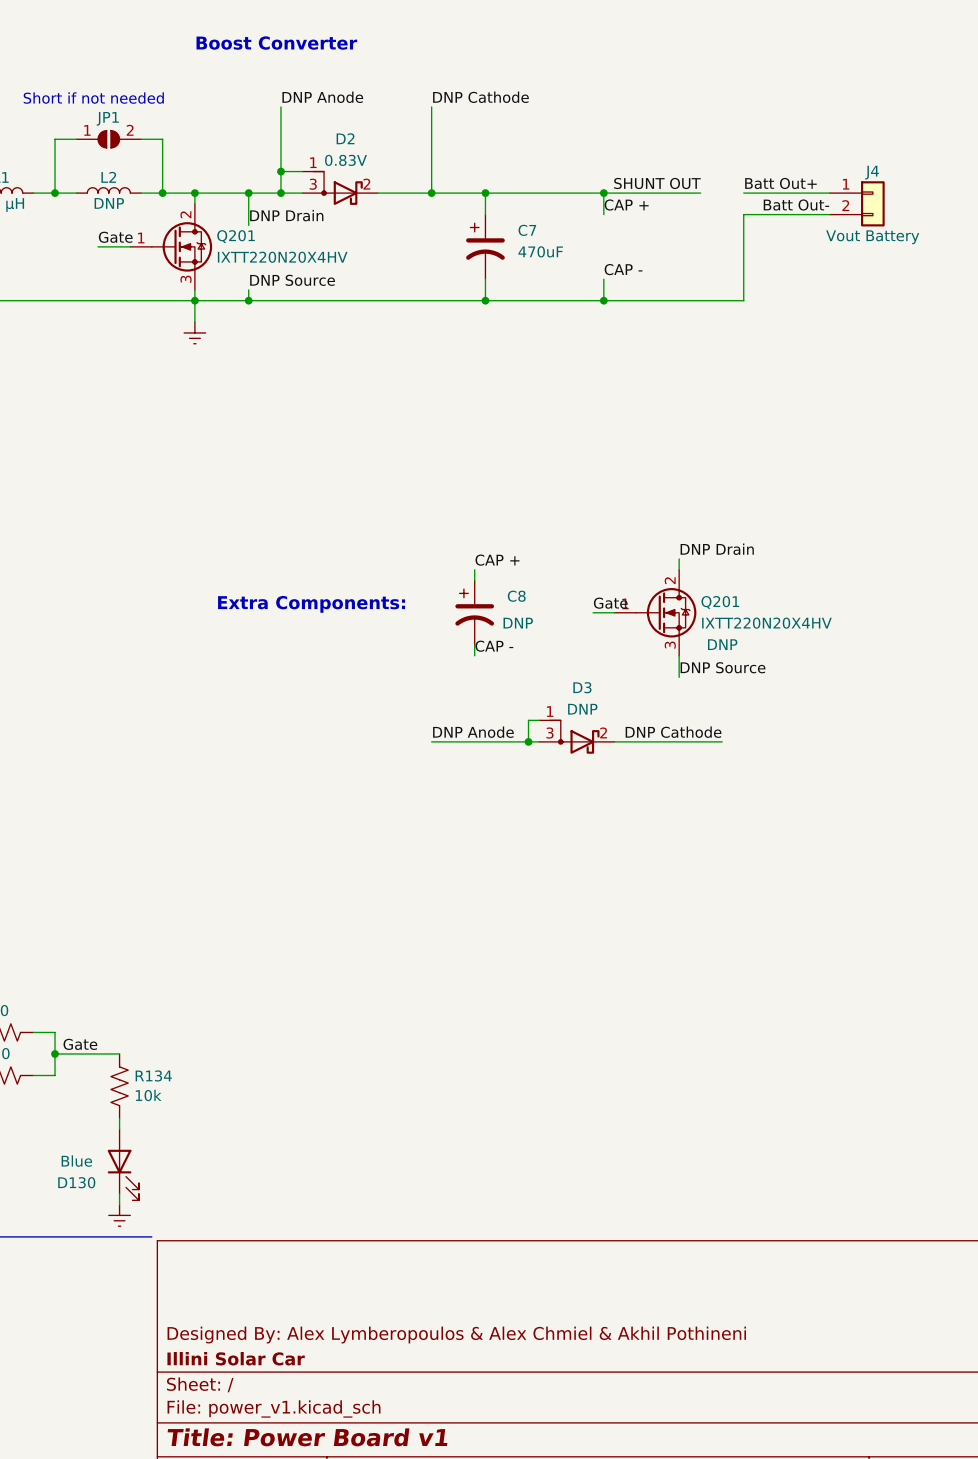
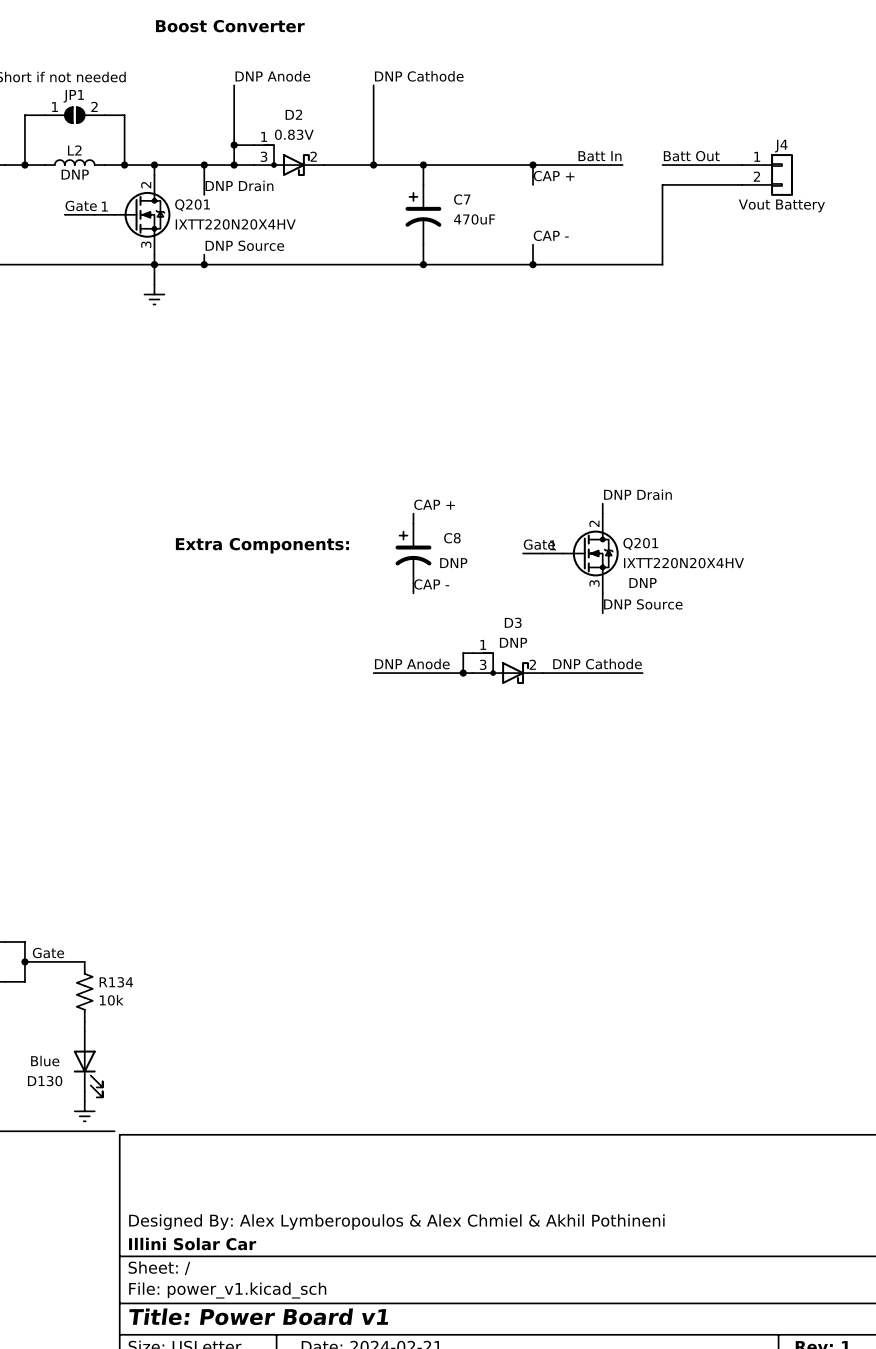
label: SHUNT OUT (657, 183) -> Batt In (599, 156)
label: Batt Out+ (780, 183) -> Batt Out (691, 156)
label: Batt Out- (796, 205) -> none

